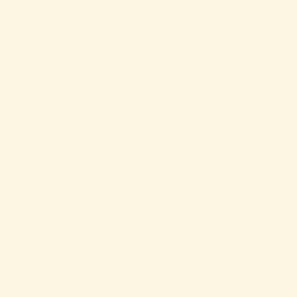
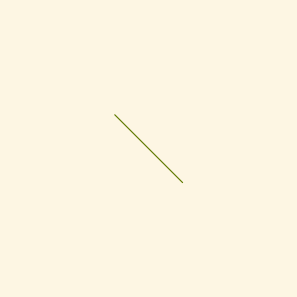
wire: none -> (114, 114) (182, 182)

